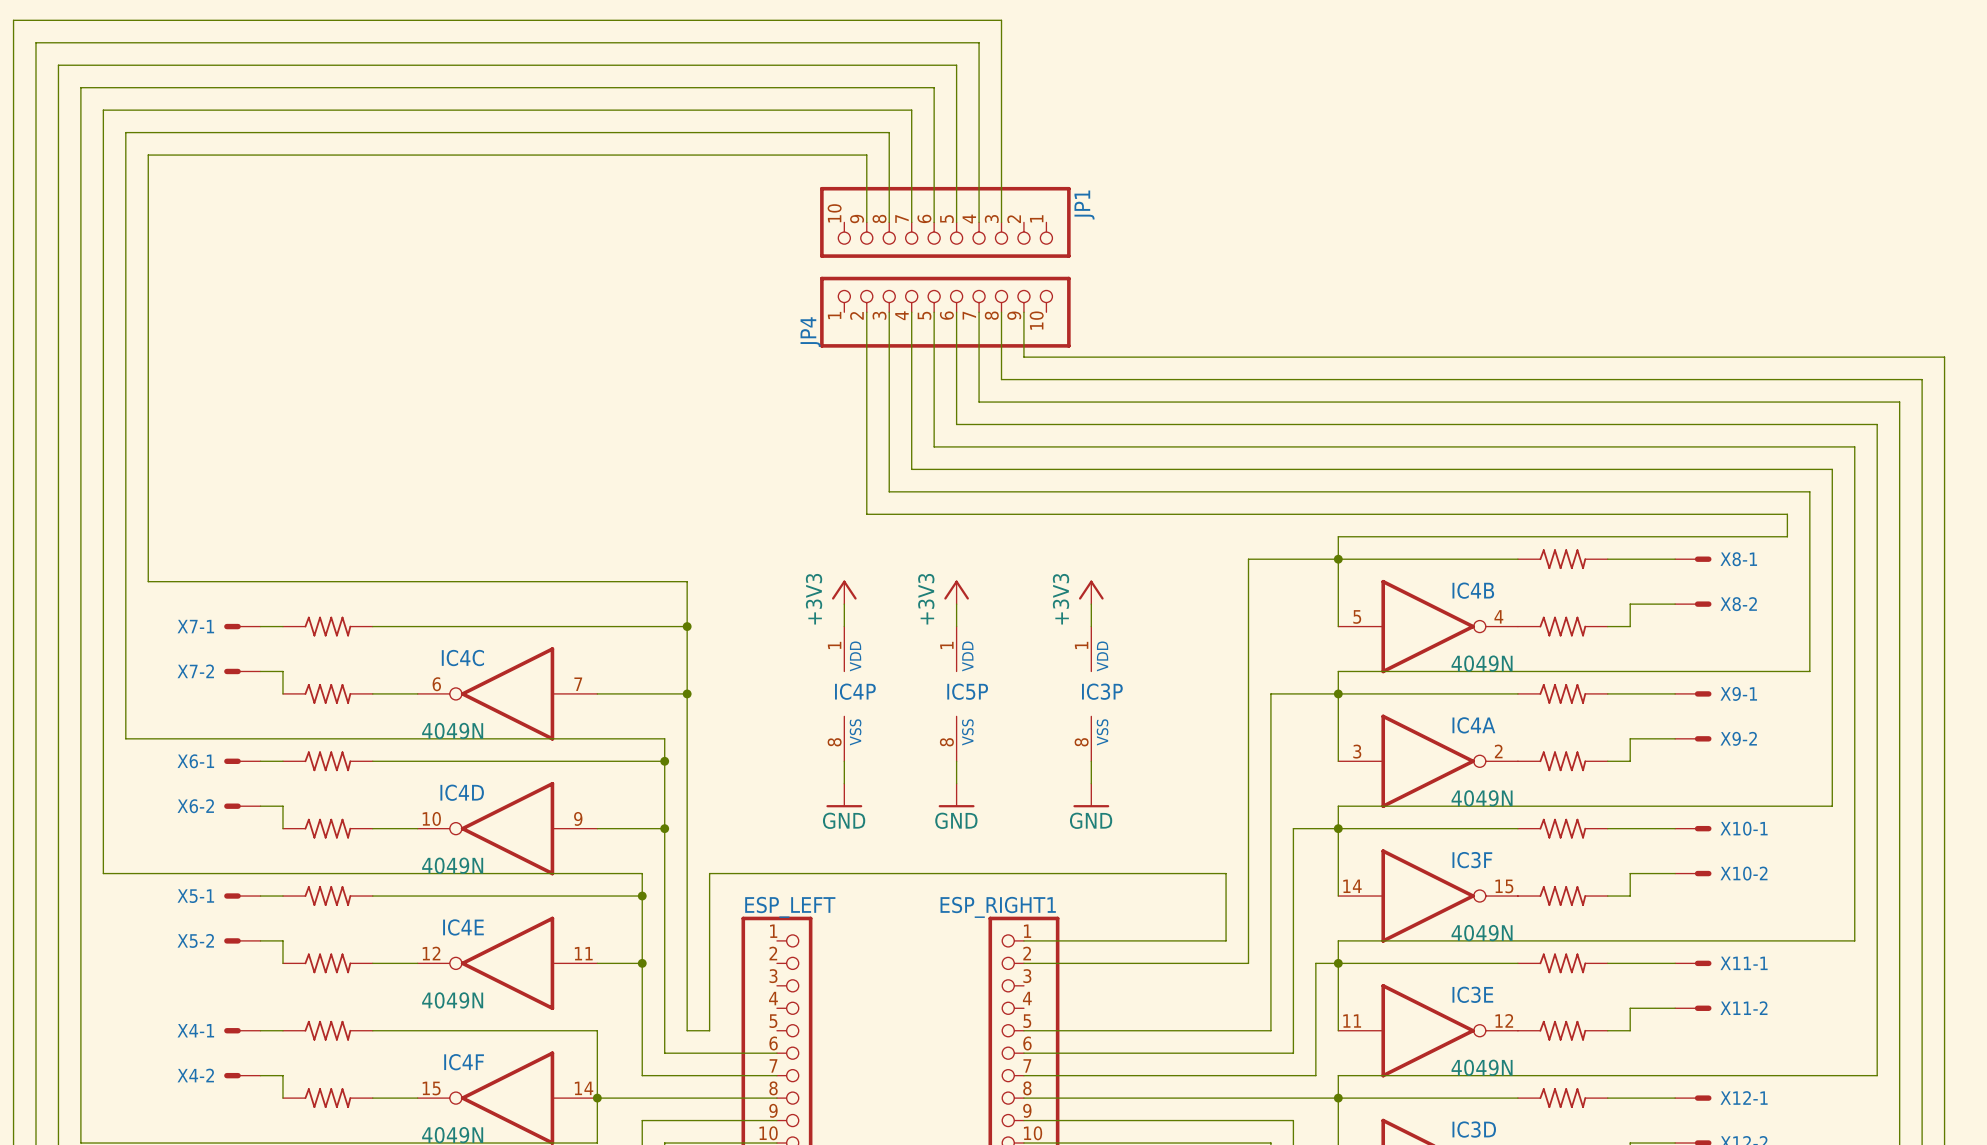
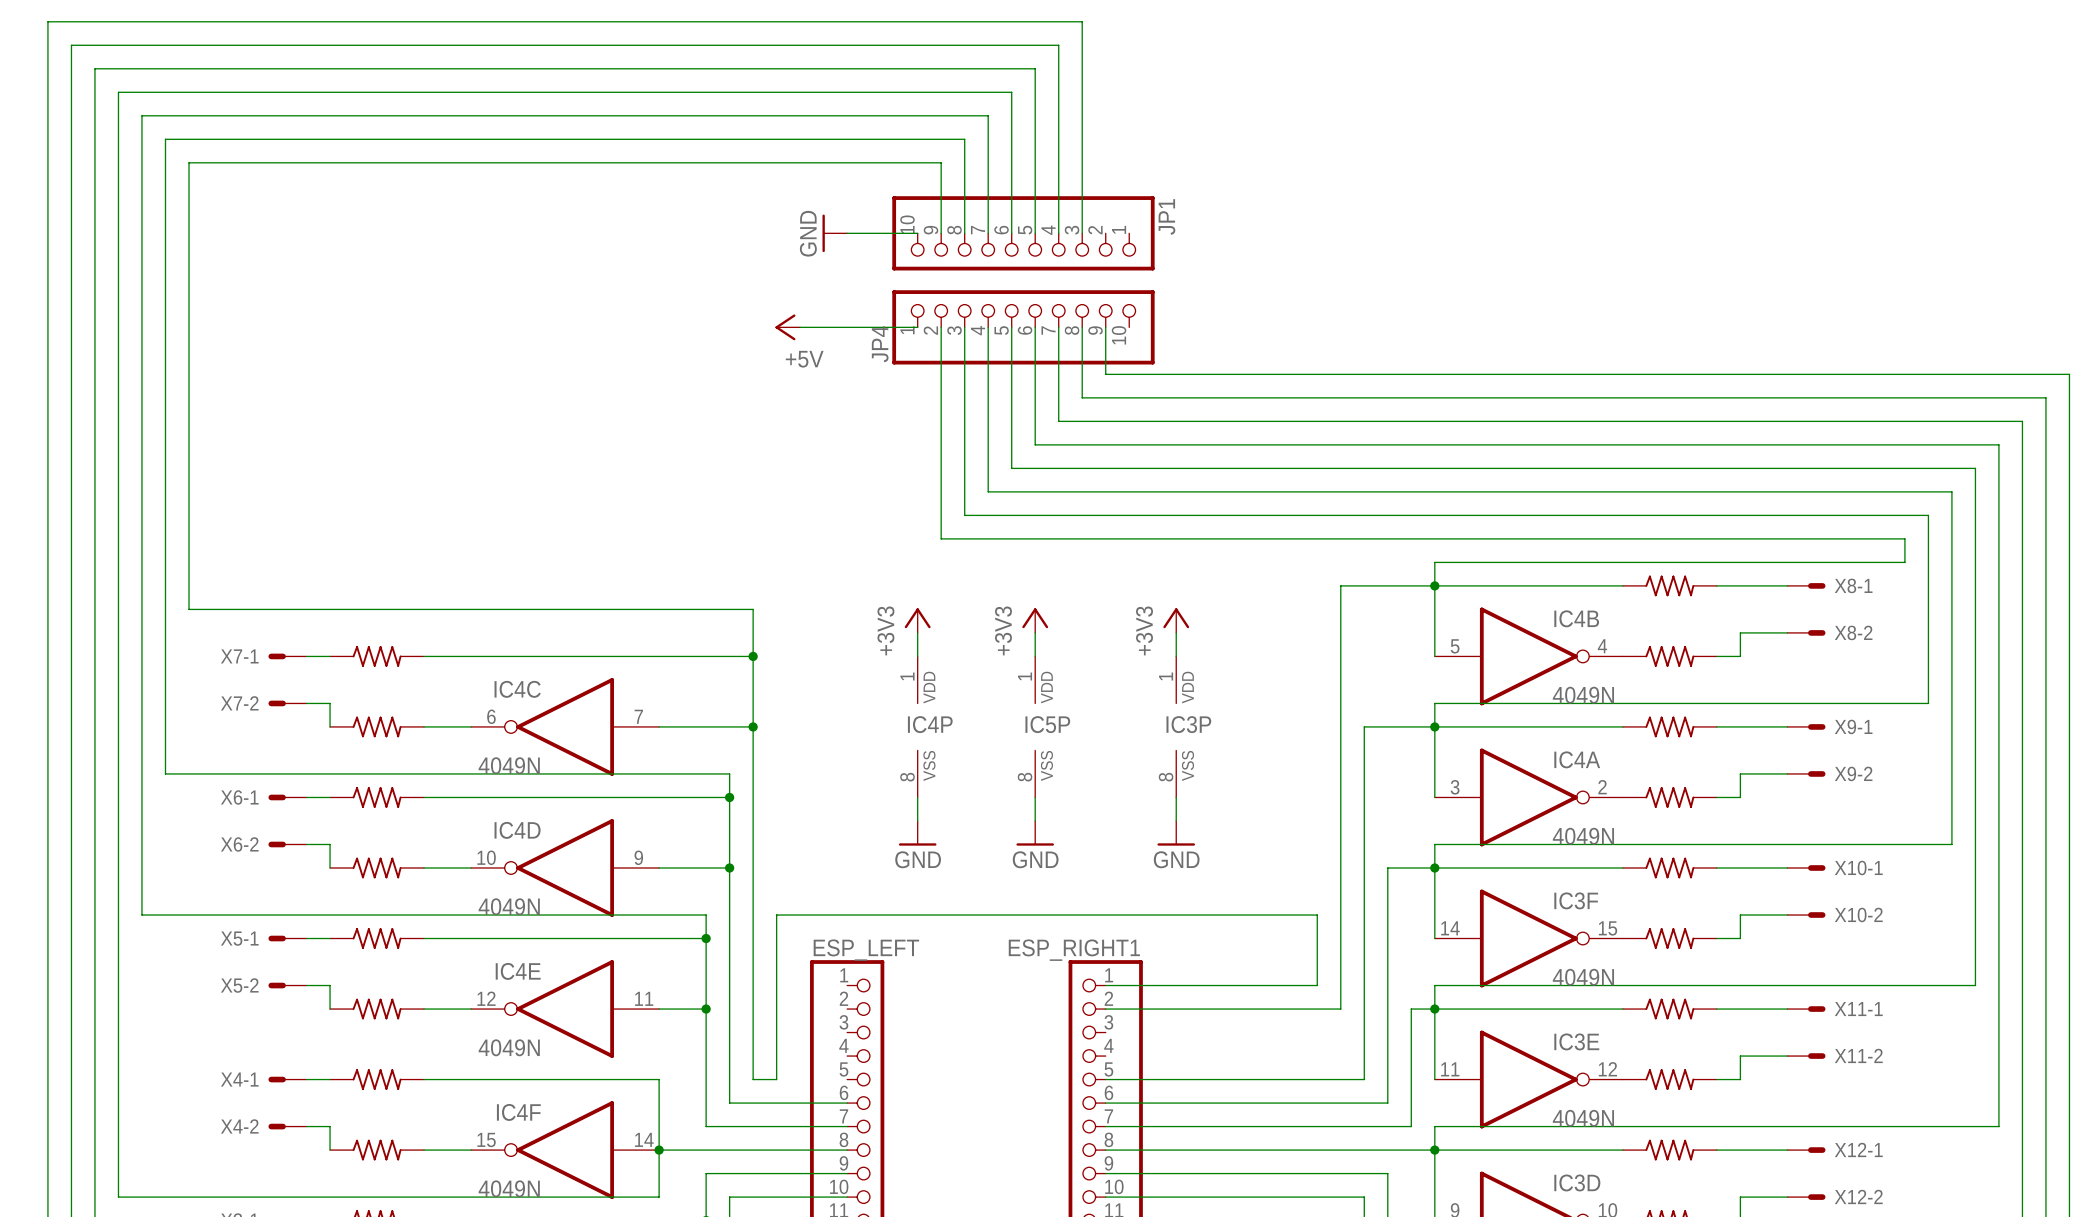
power symbol: none -> GND (834, 233)
wire: none -> (847, 233) (917, 233)
power symbol: none -> +5V (787, 327)
wire: none -> (800, 327) (917, 327)

